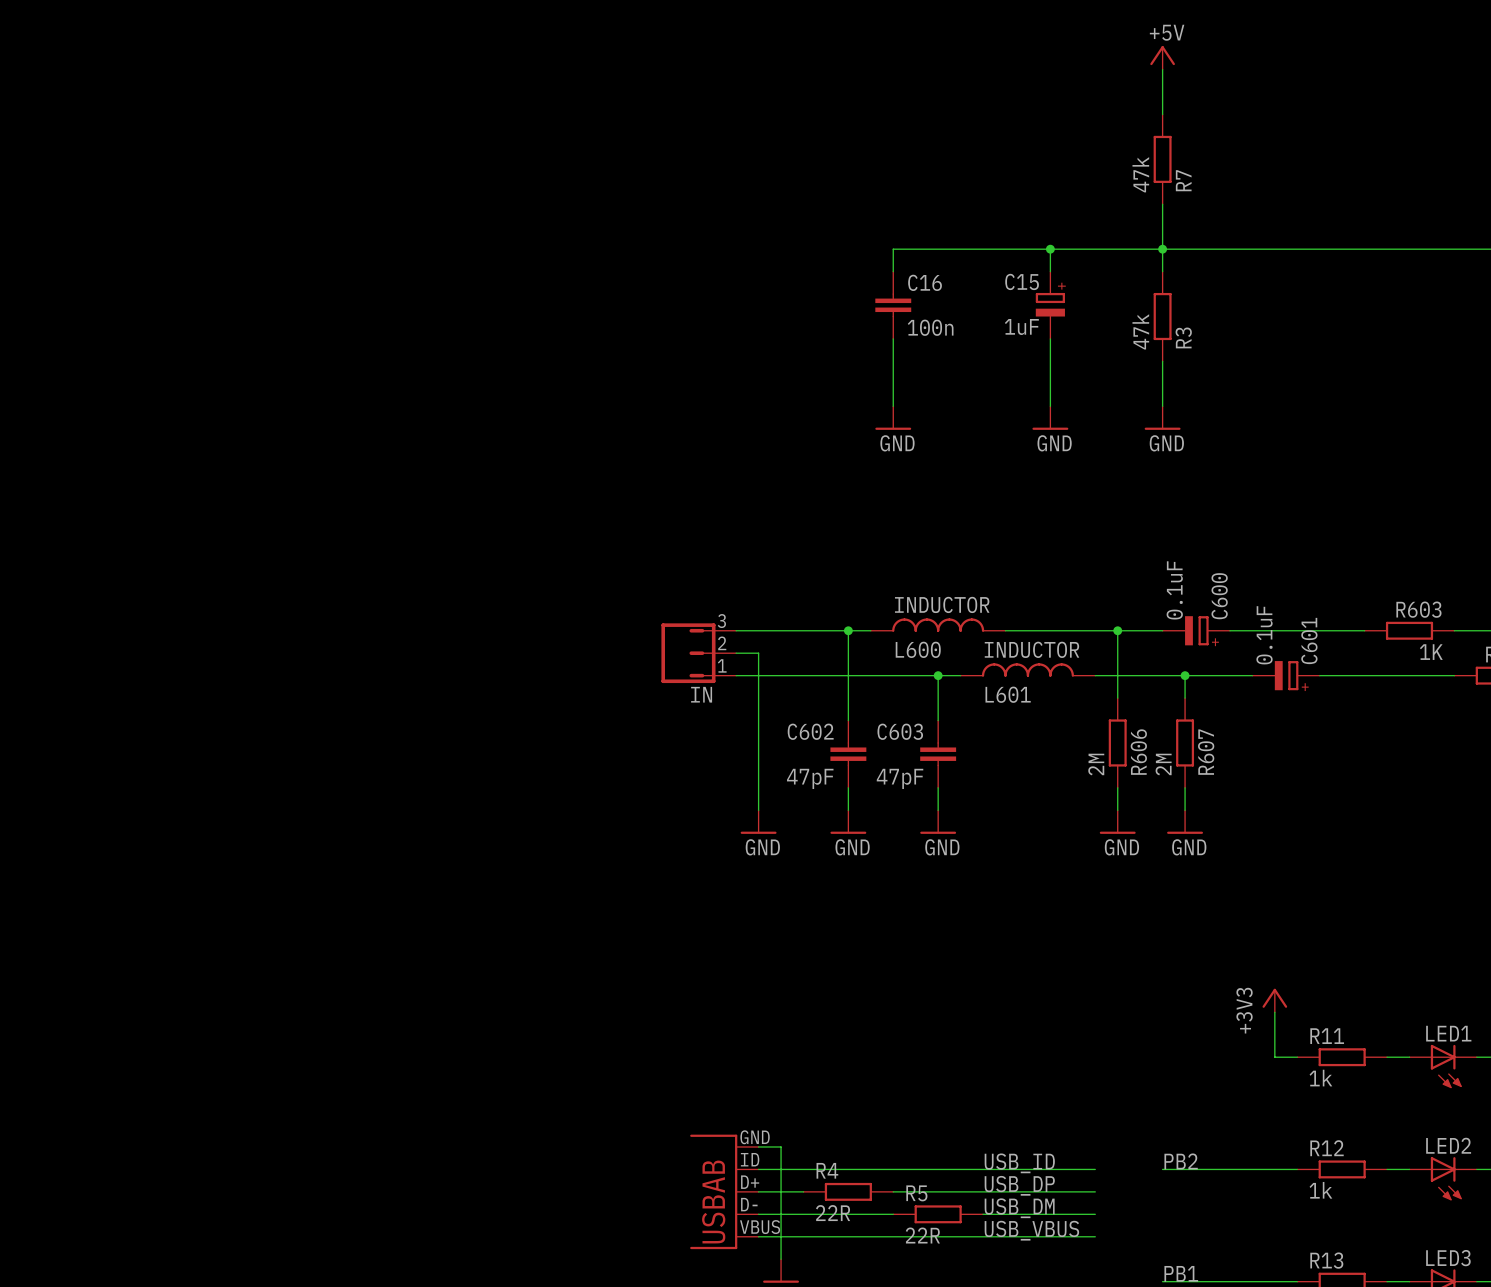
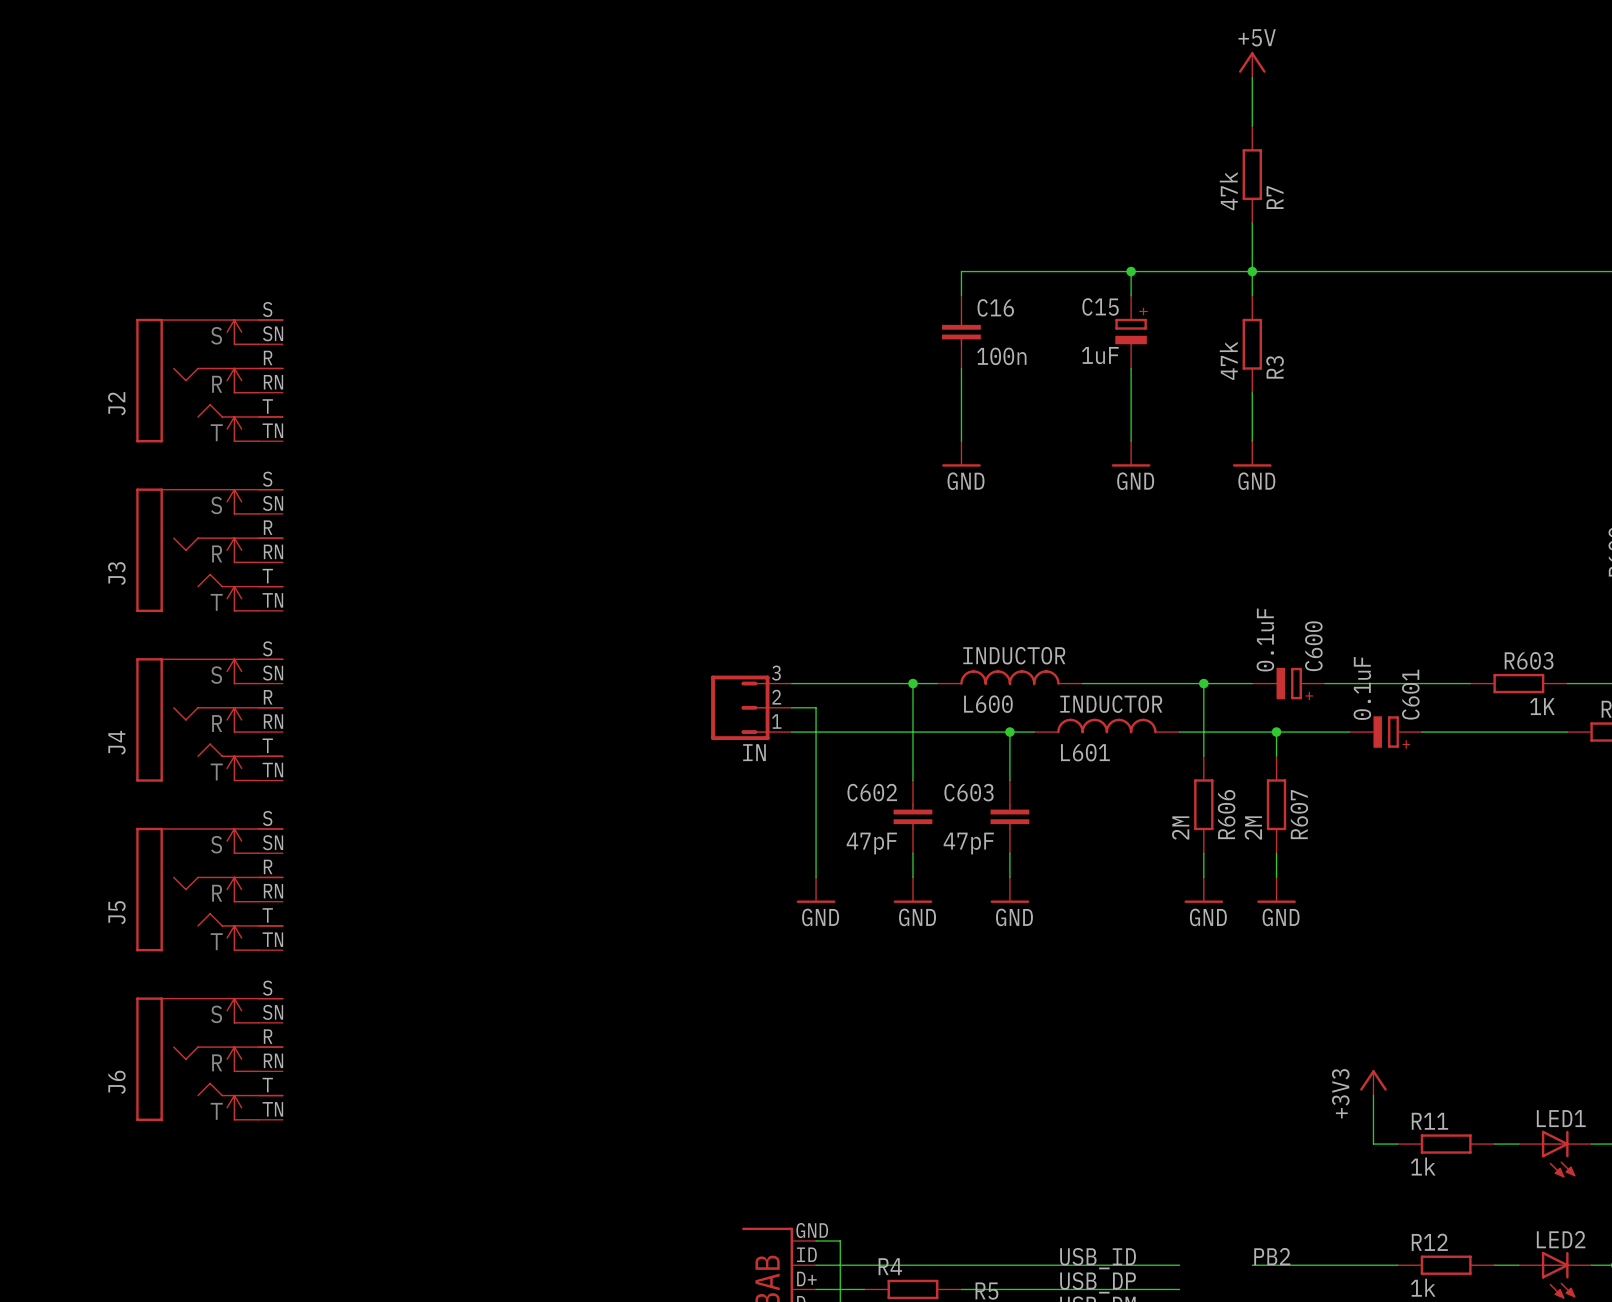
J2: none -> (209, 380)
J3: none -> (209, 550)
J4: none -> (209, 719)
J5: none -> (209, 889)
J6: none -> (209, 1059)

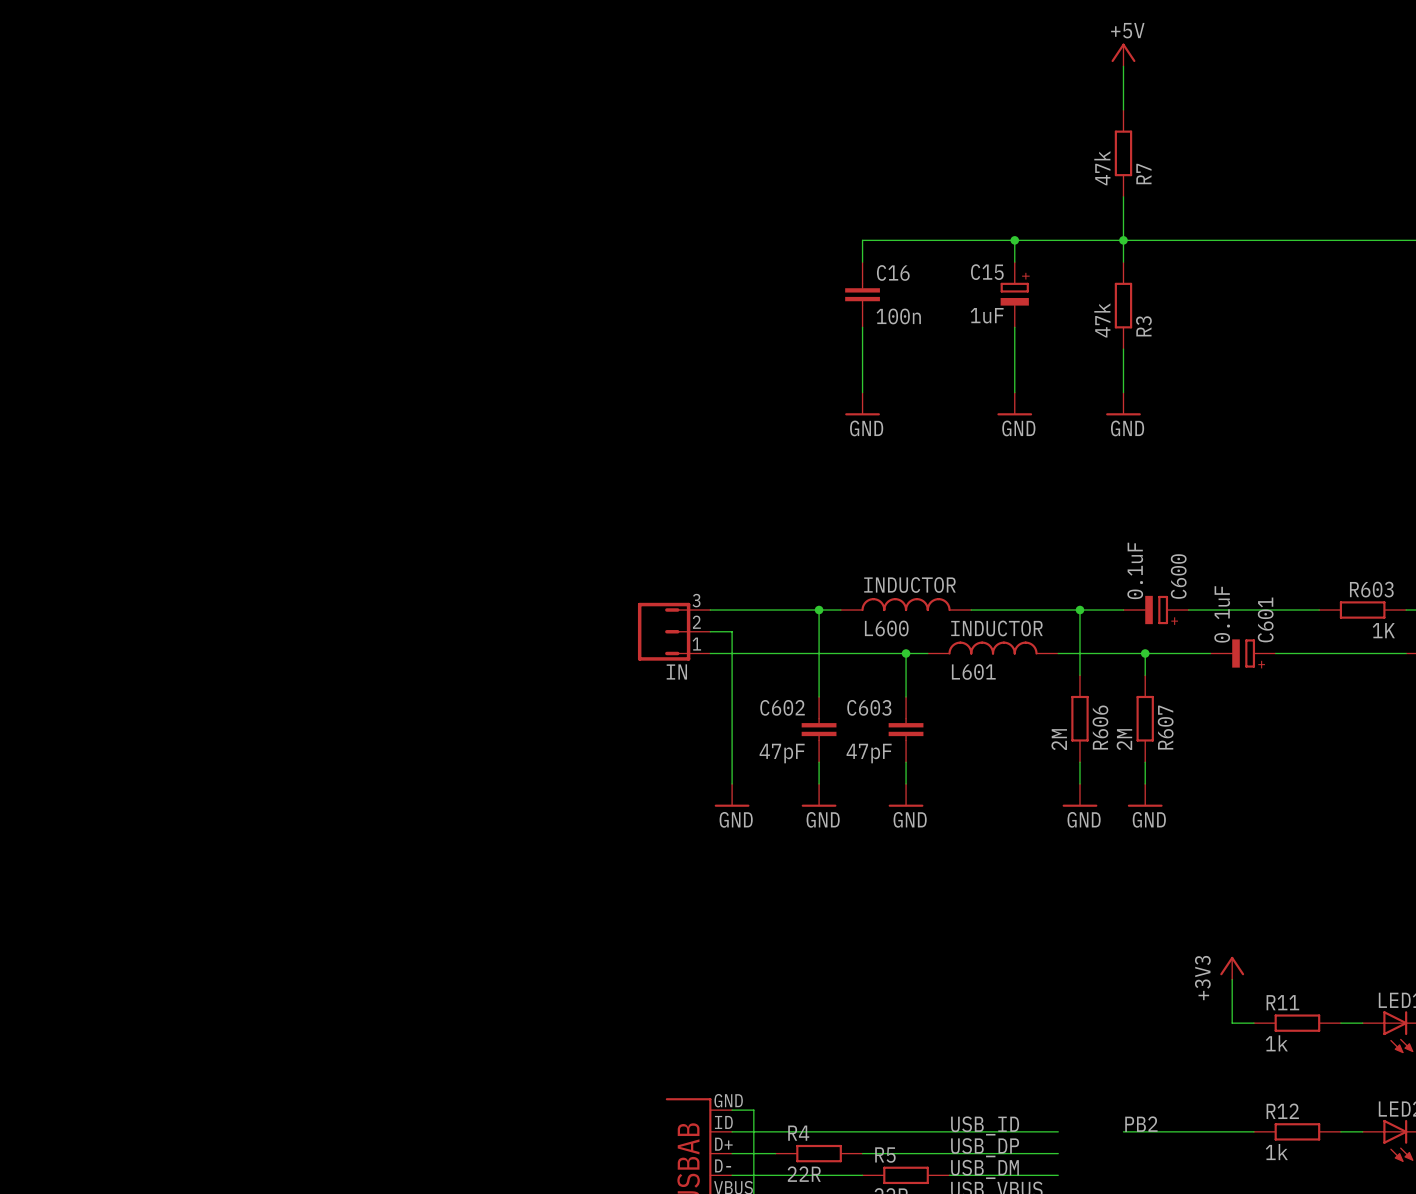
J2: (209, 380) -> none
J3: (209, 550) -> none
J4: (209, 719) -> none
J5: (209, 889) -> none
J6: (209, 1059) -> none

